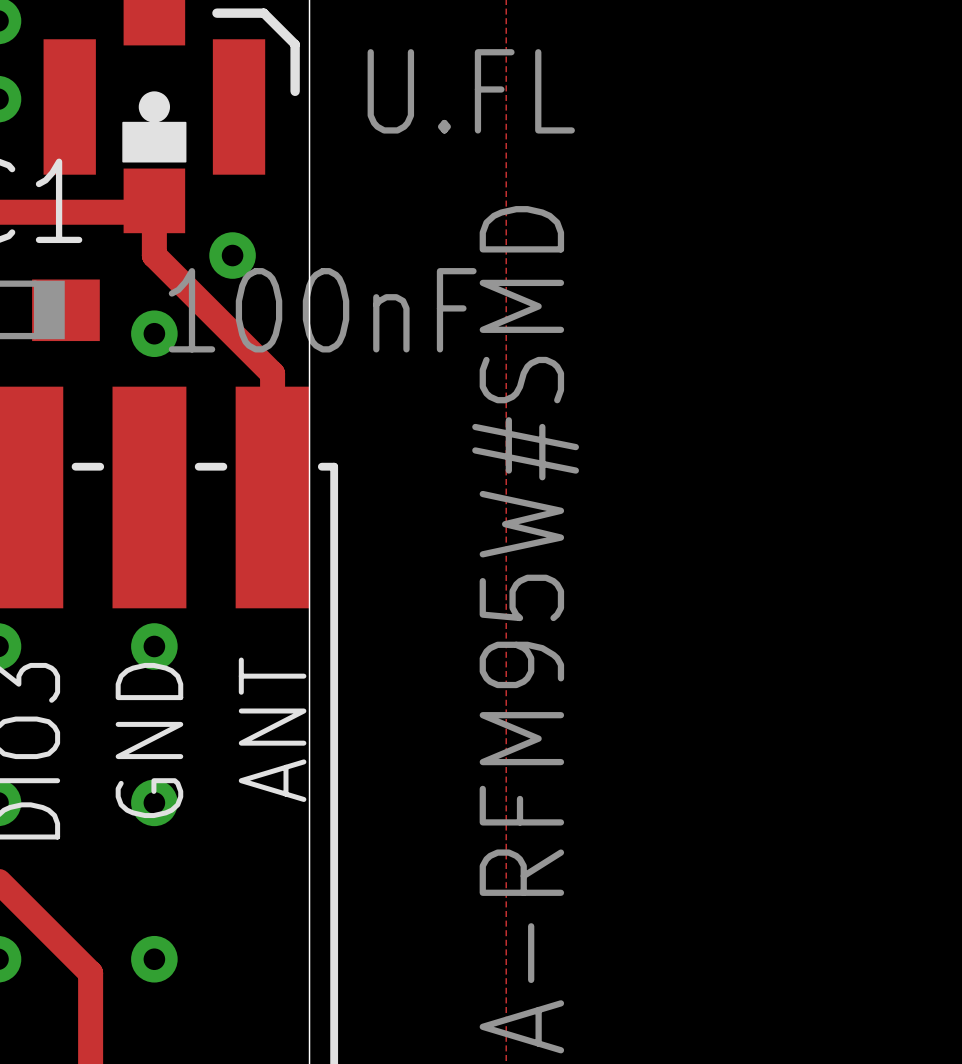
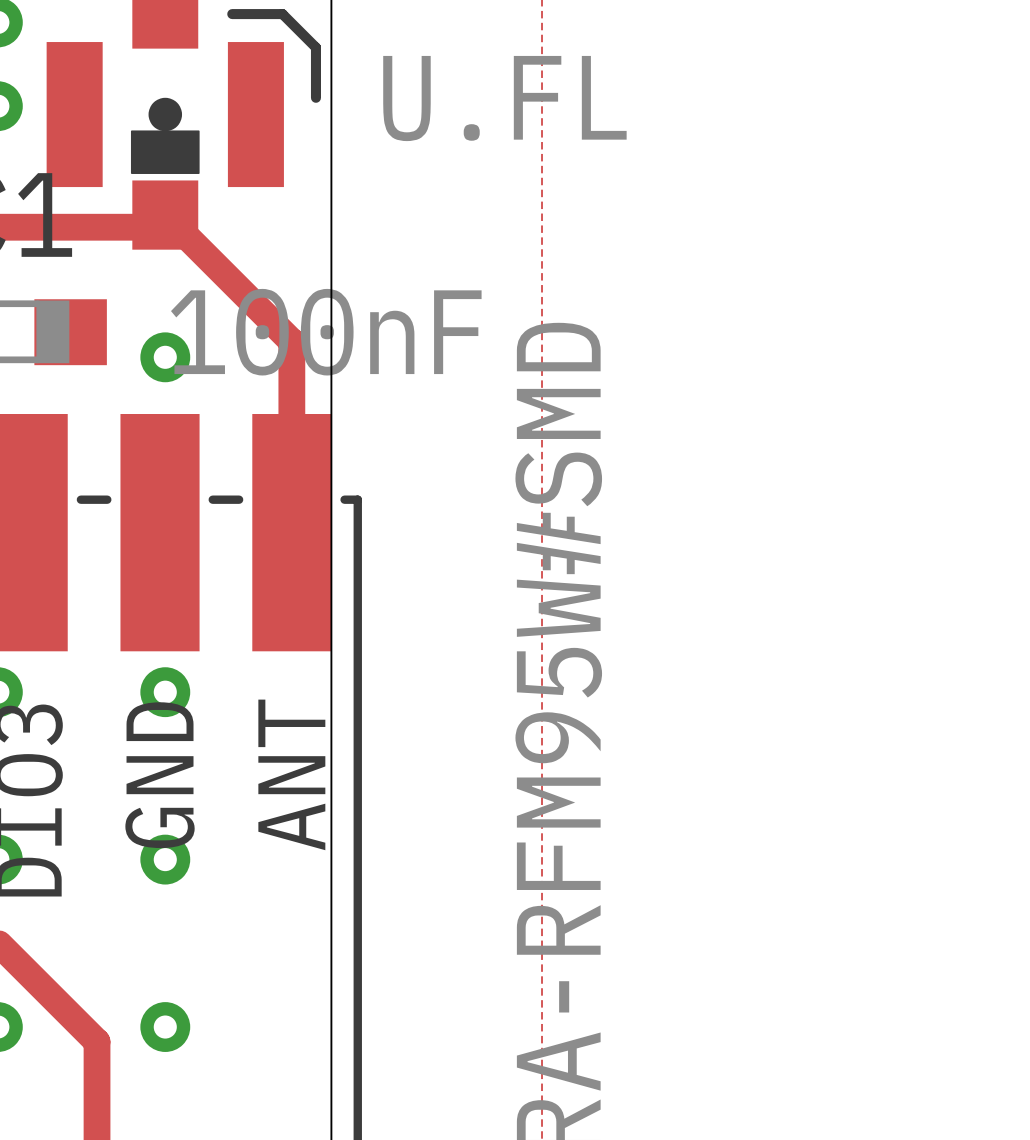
track: (154, 200) (154, 255) (272, 373) -> (165, 215) (291, 341) (291, 400)
via: (232, 255) -> none

